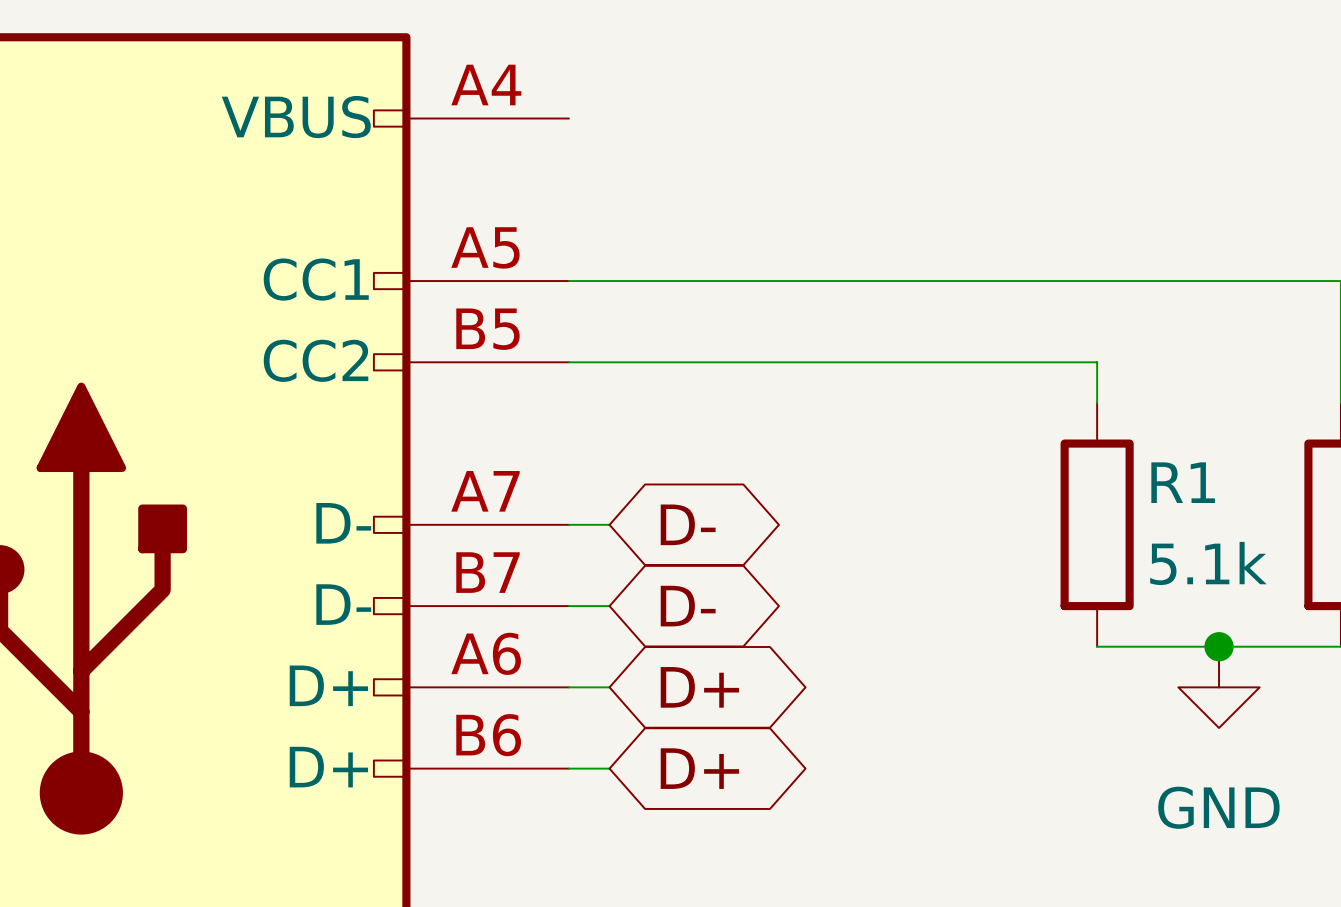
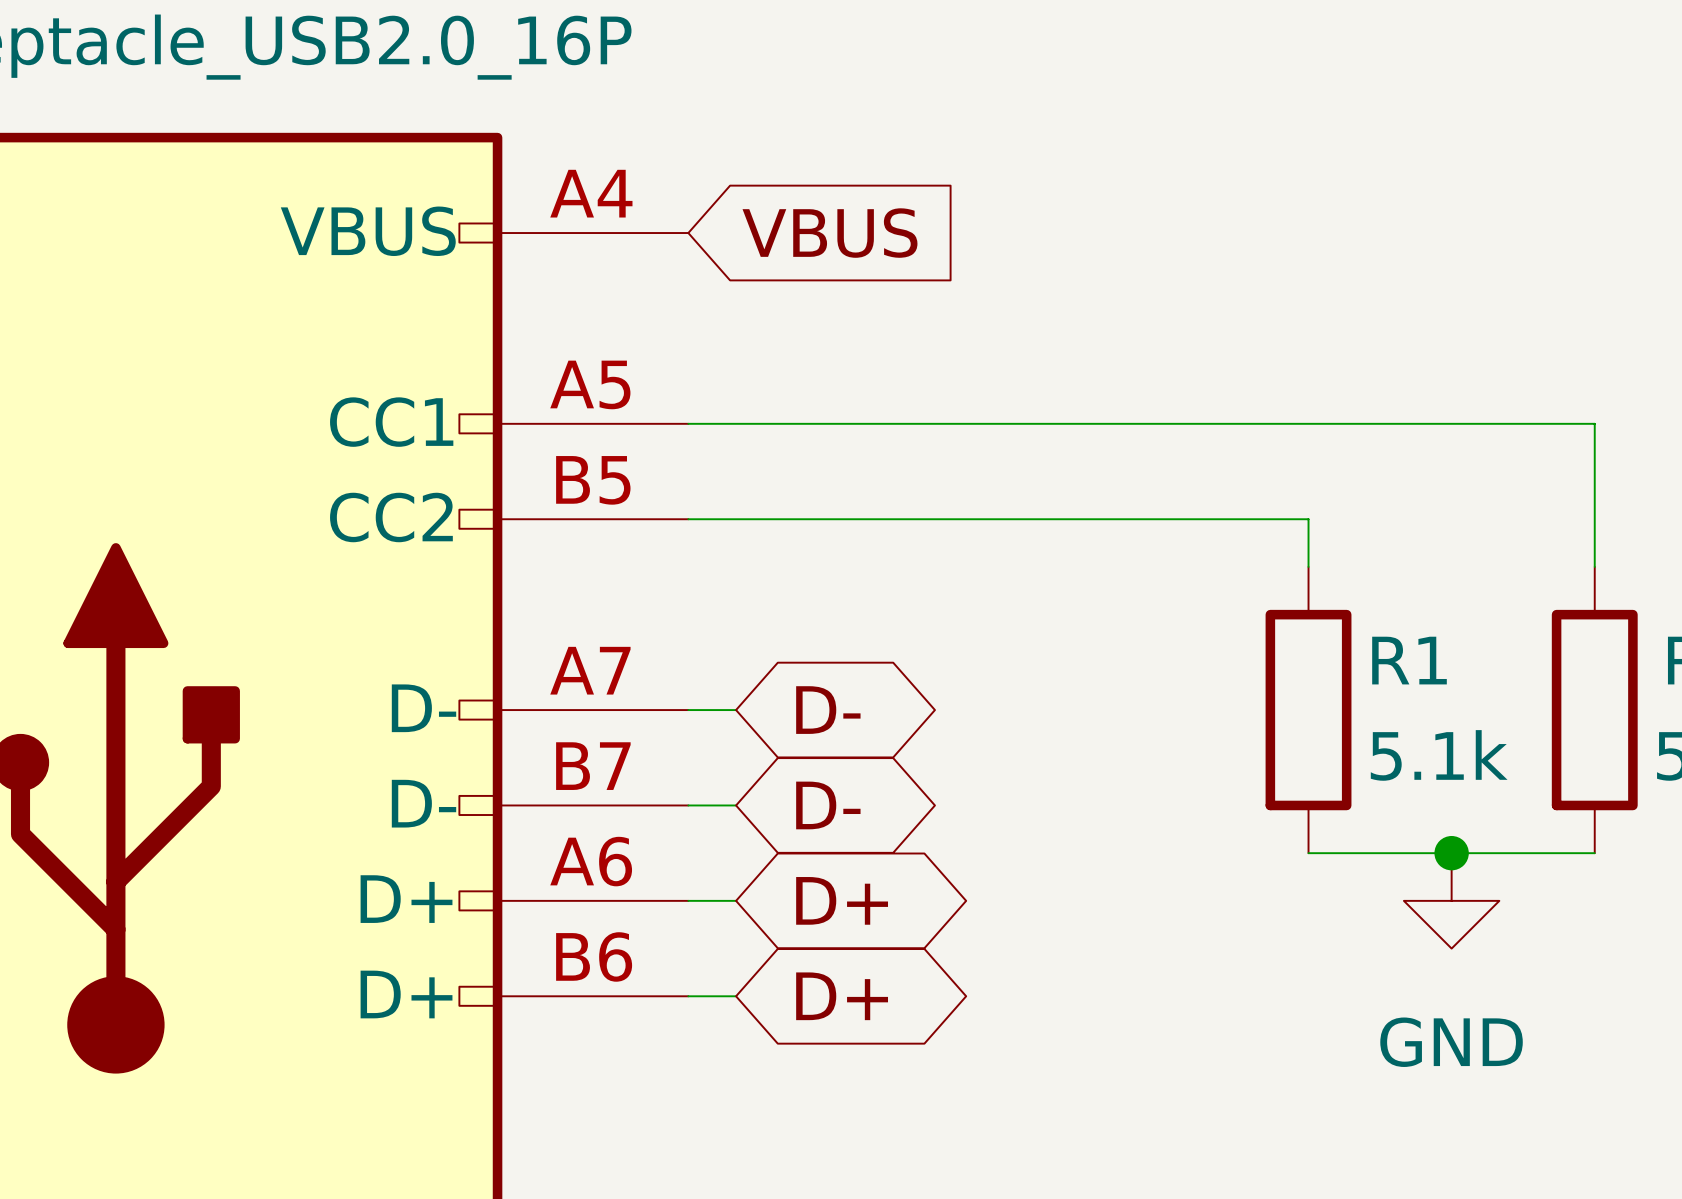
global label: none -> VBUS (830, 233)

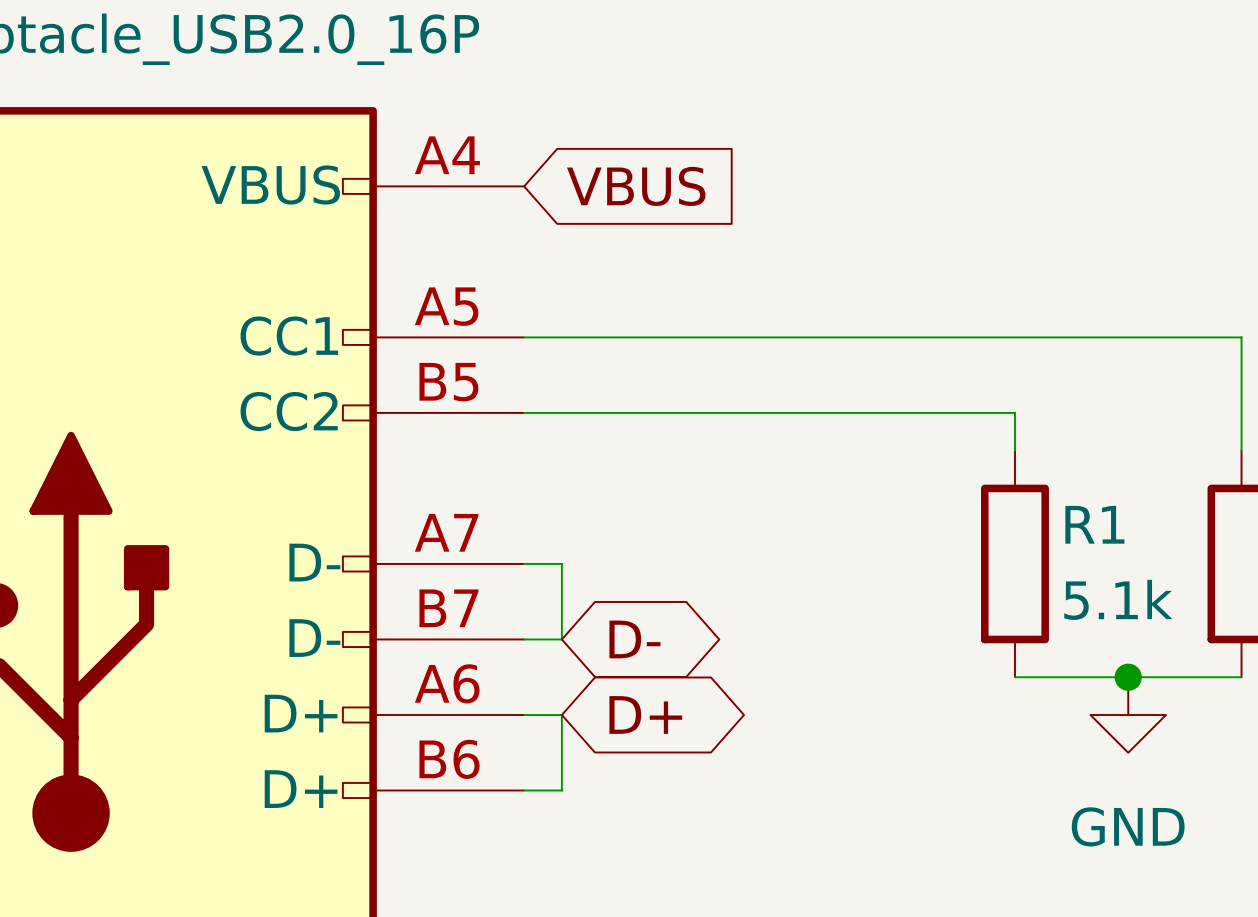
wire: none -> (561, 563) (561, 639)
global label: D- (828, 710) -> none
wire: none -> (561, 714) (561, 790)
global label: D+ (842, 996) -> none

